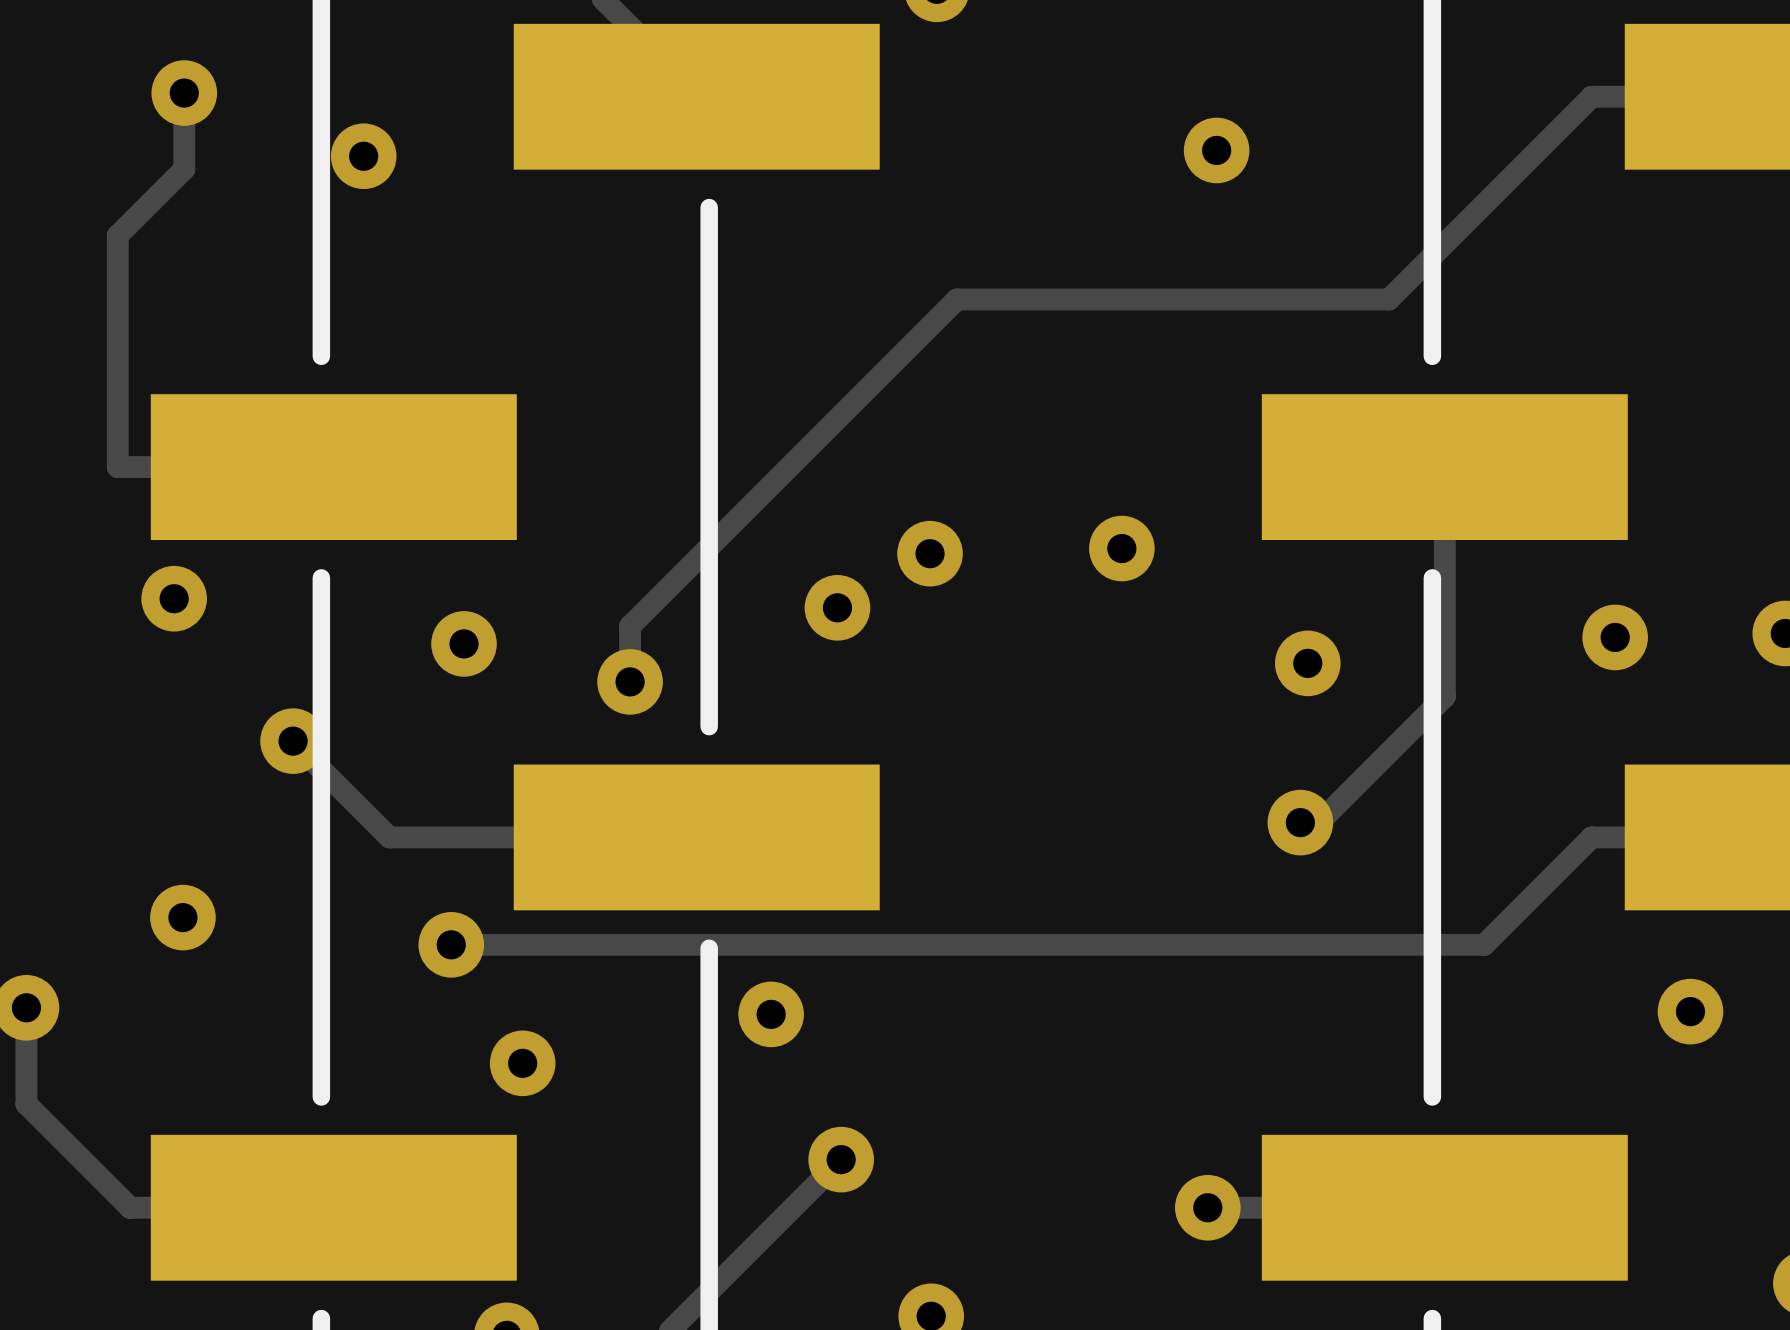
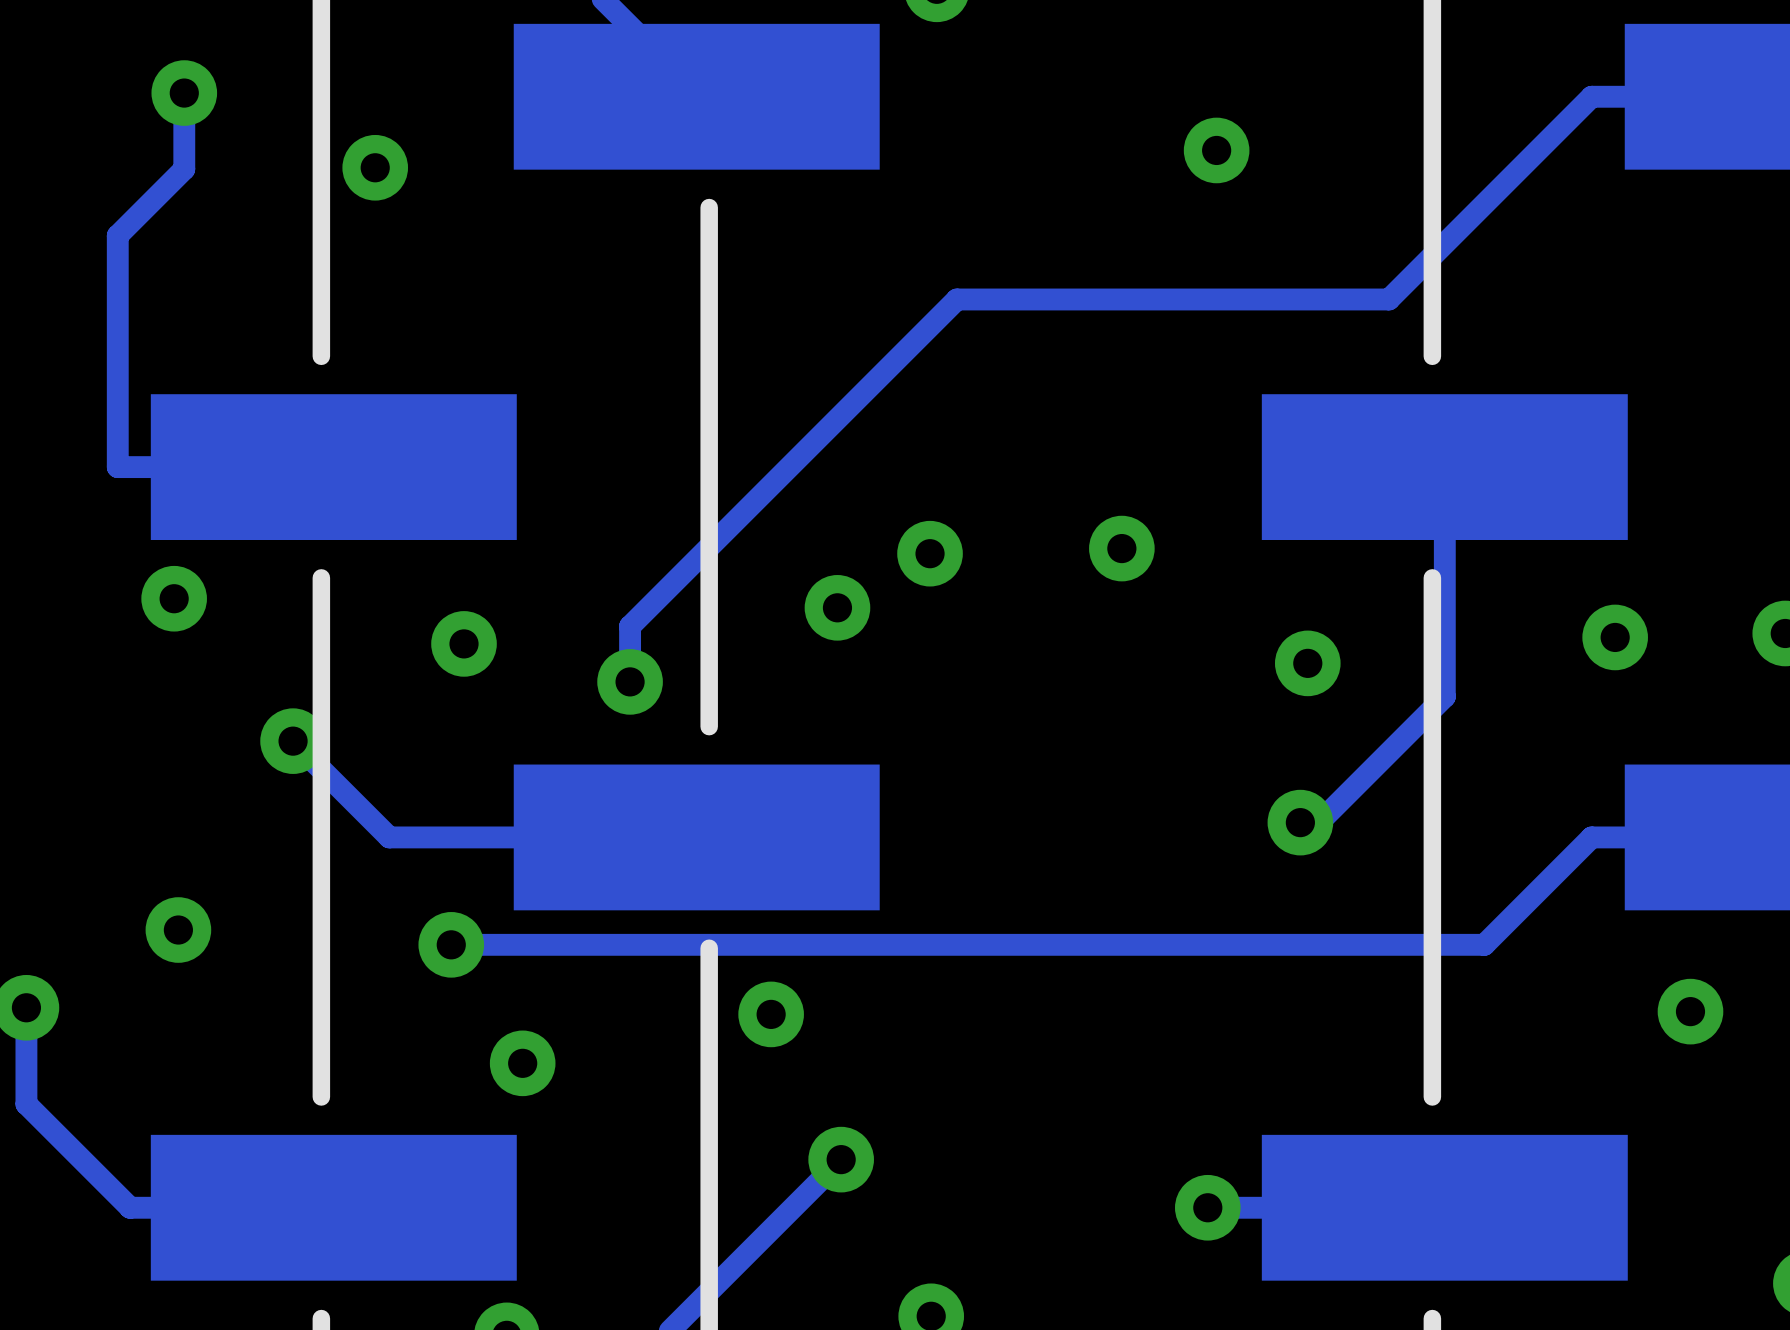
via position: (363, 156) -> (375, 167)
via position: (182, 917) -> (178, 930)

